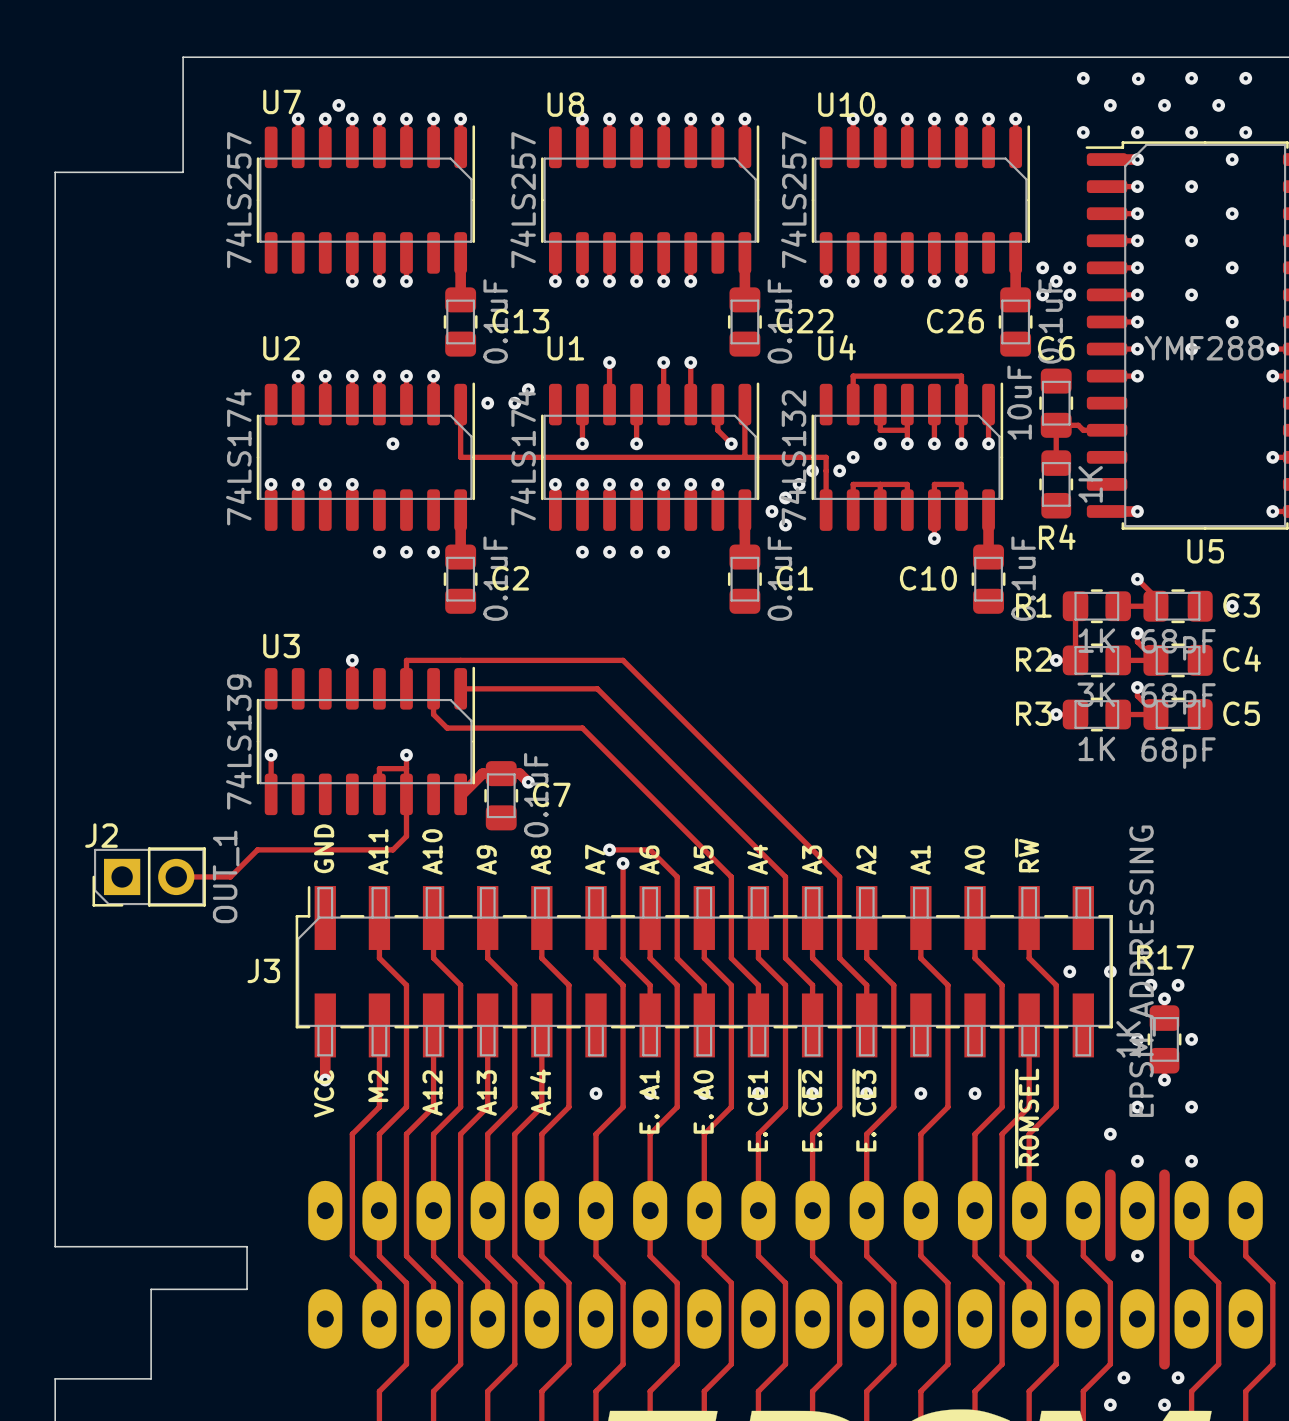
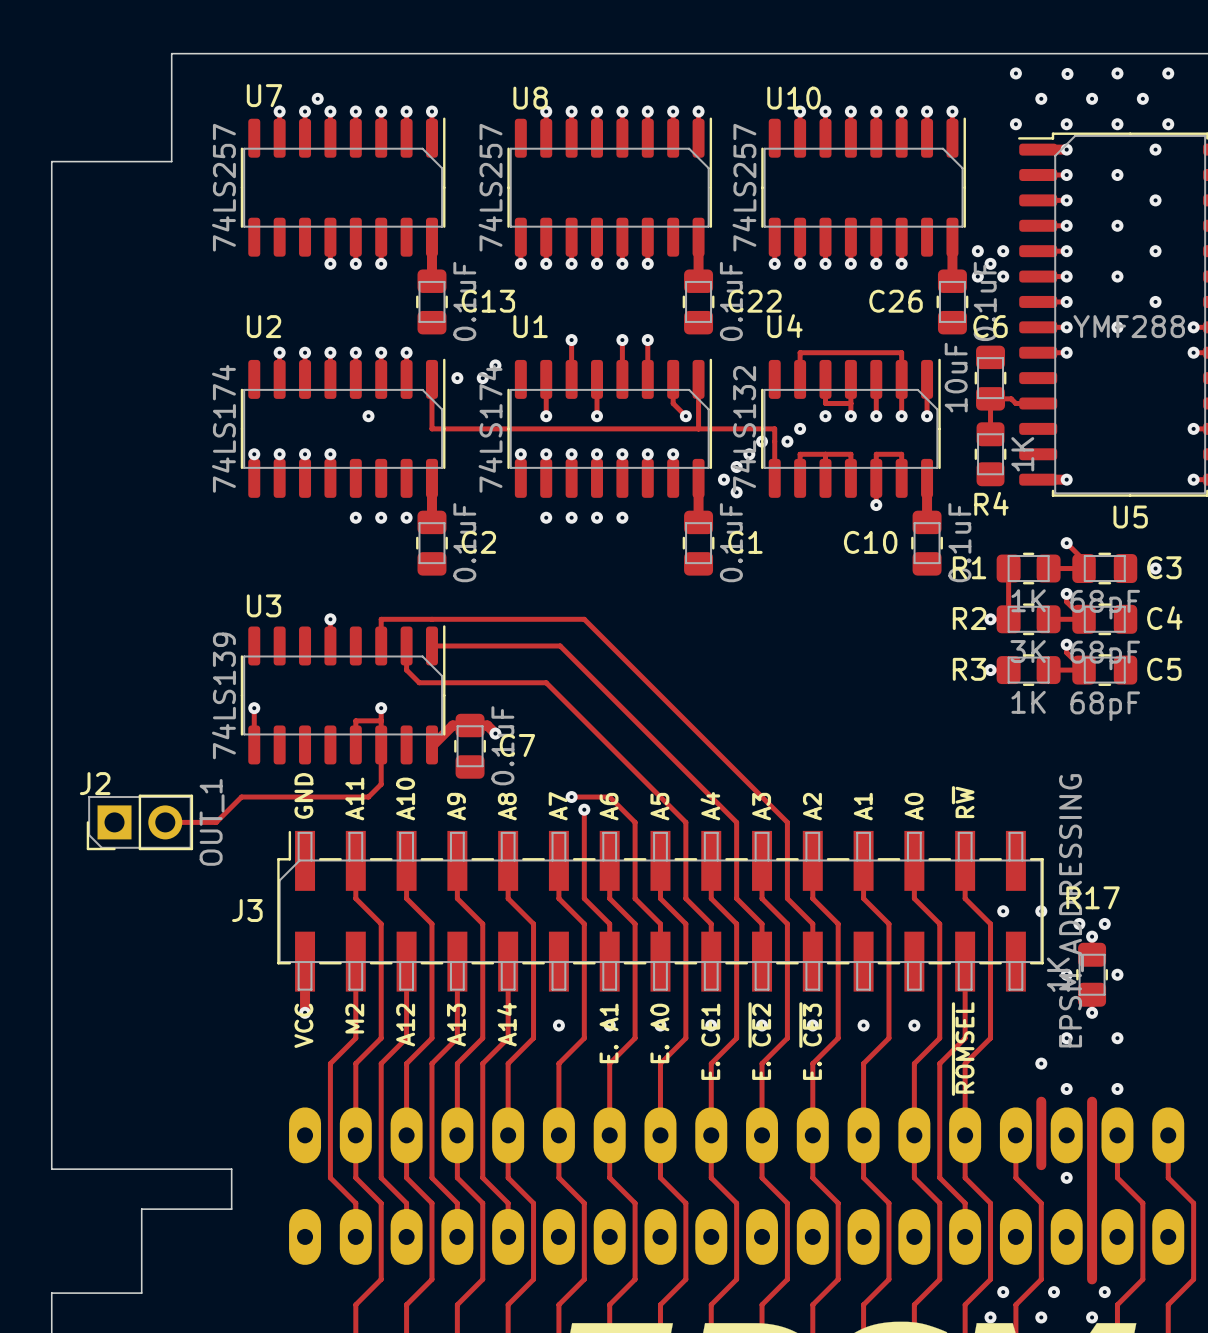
track: (1110, 1242) (1110, 1255) -> none
via: none -> (1003, 1292)
via: none -> (990, 1317)

